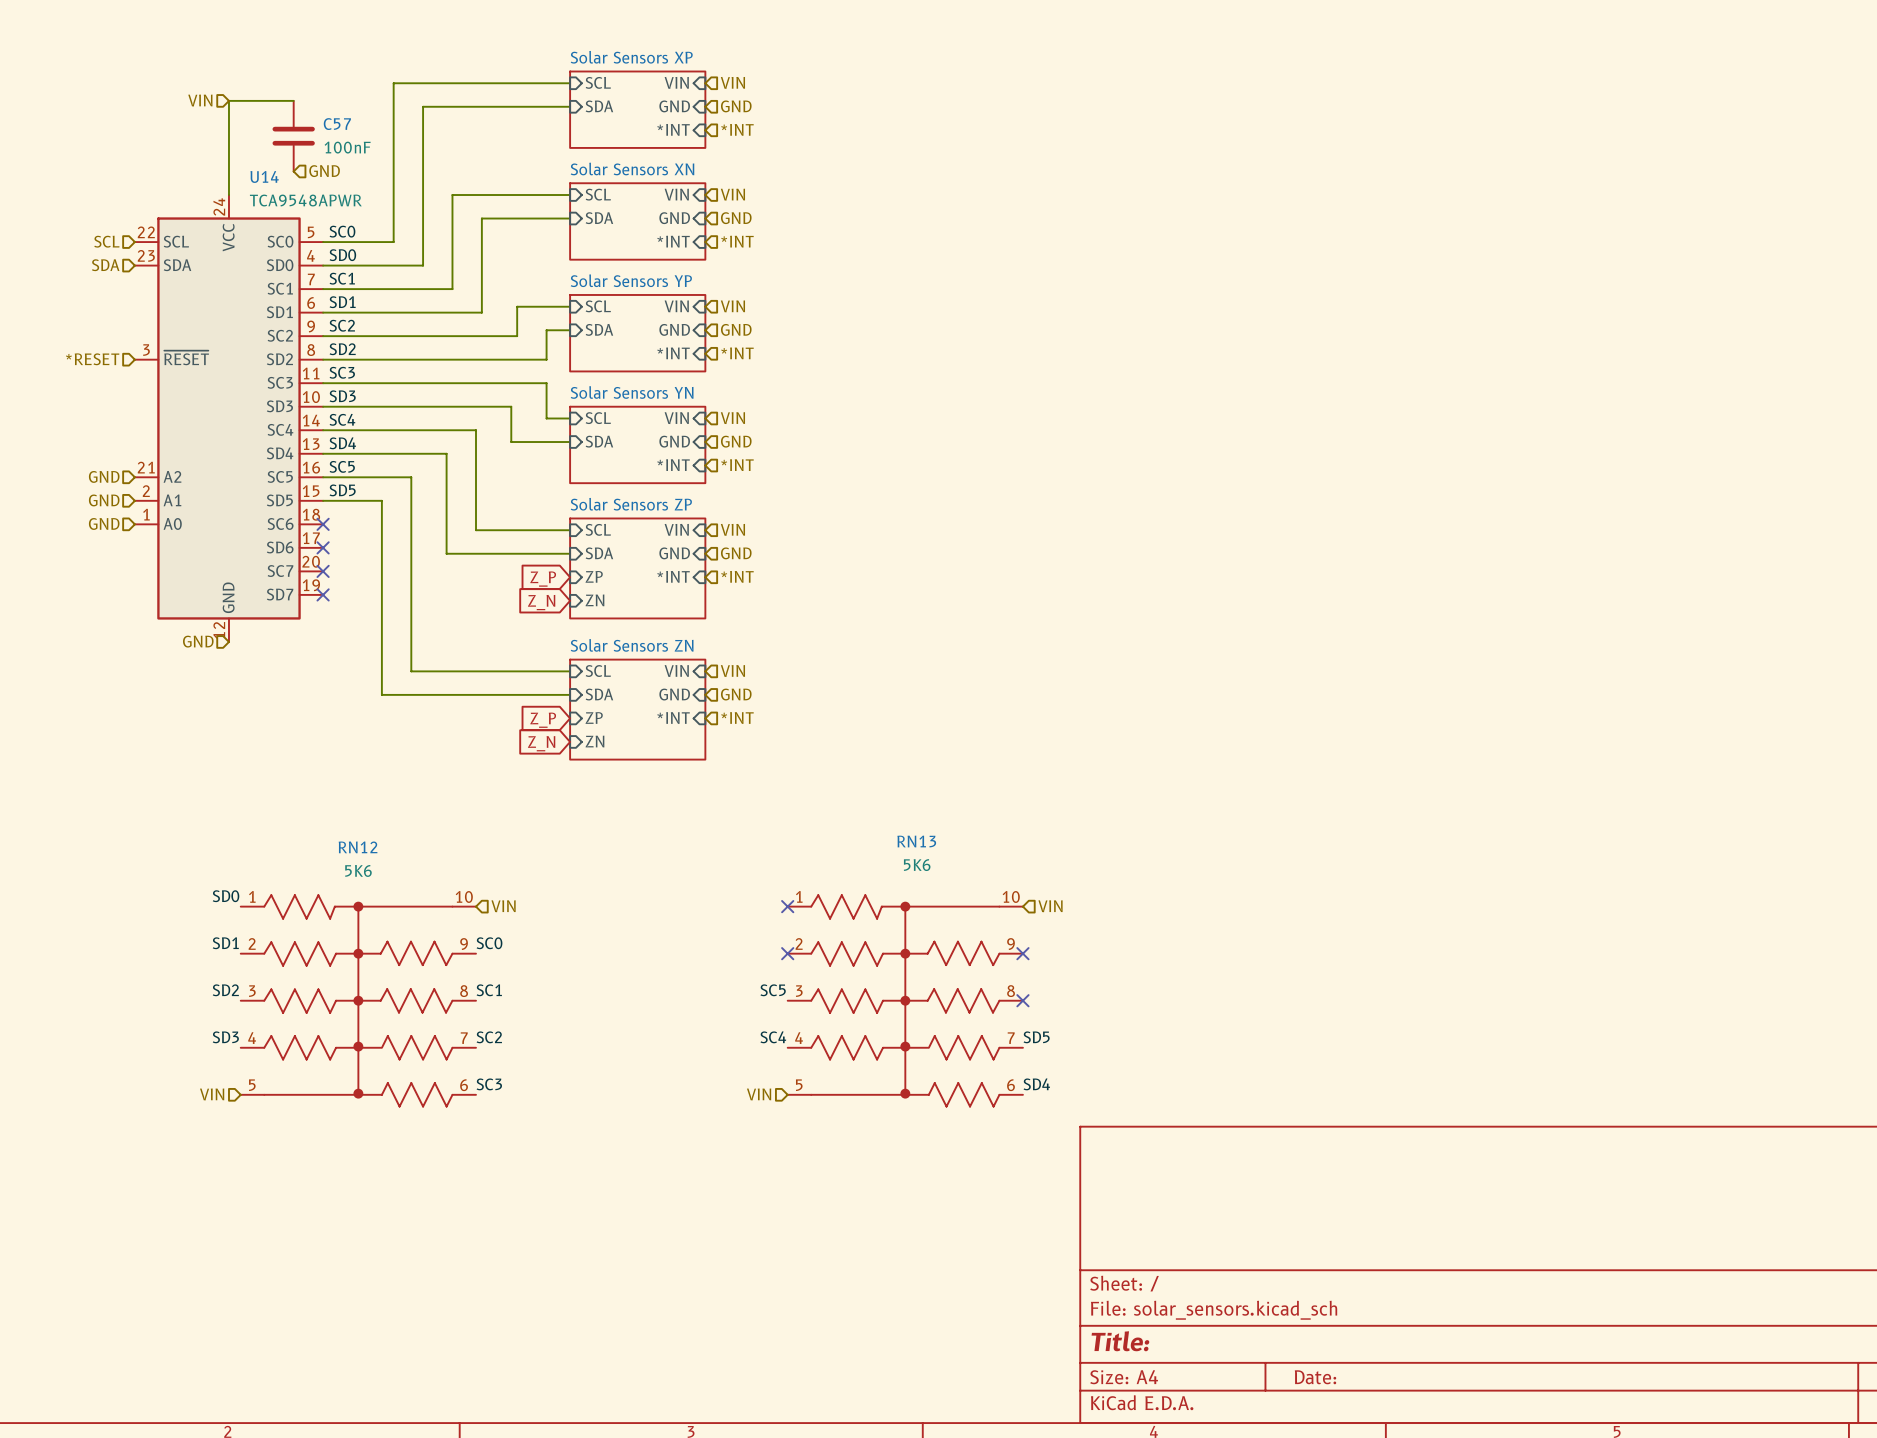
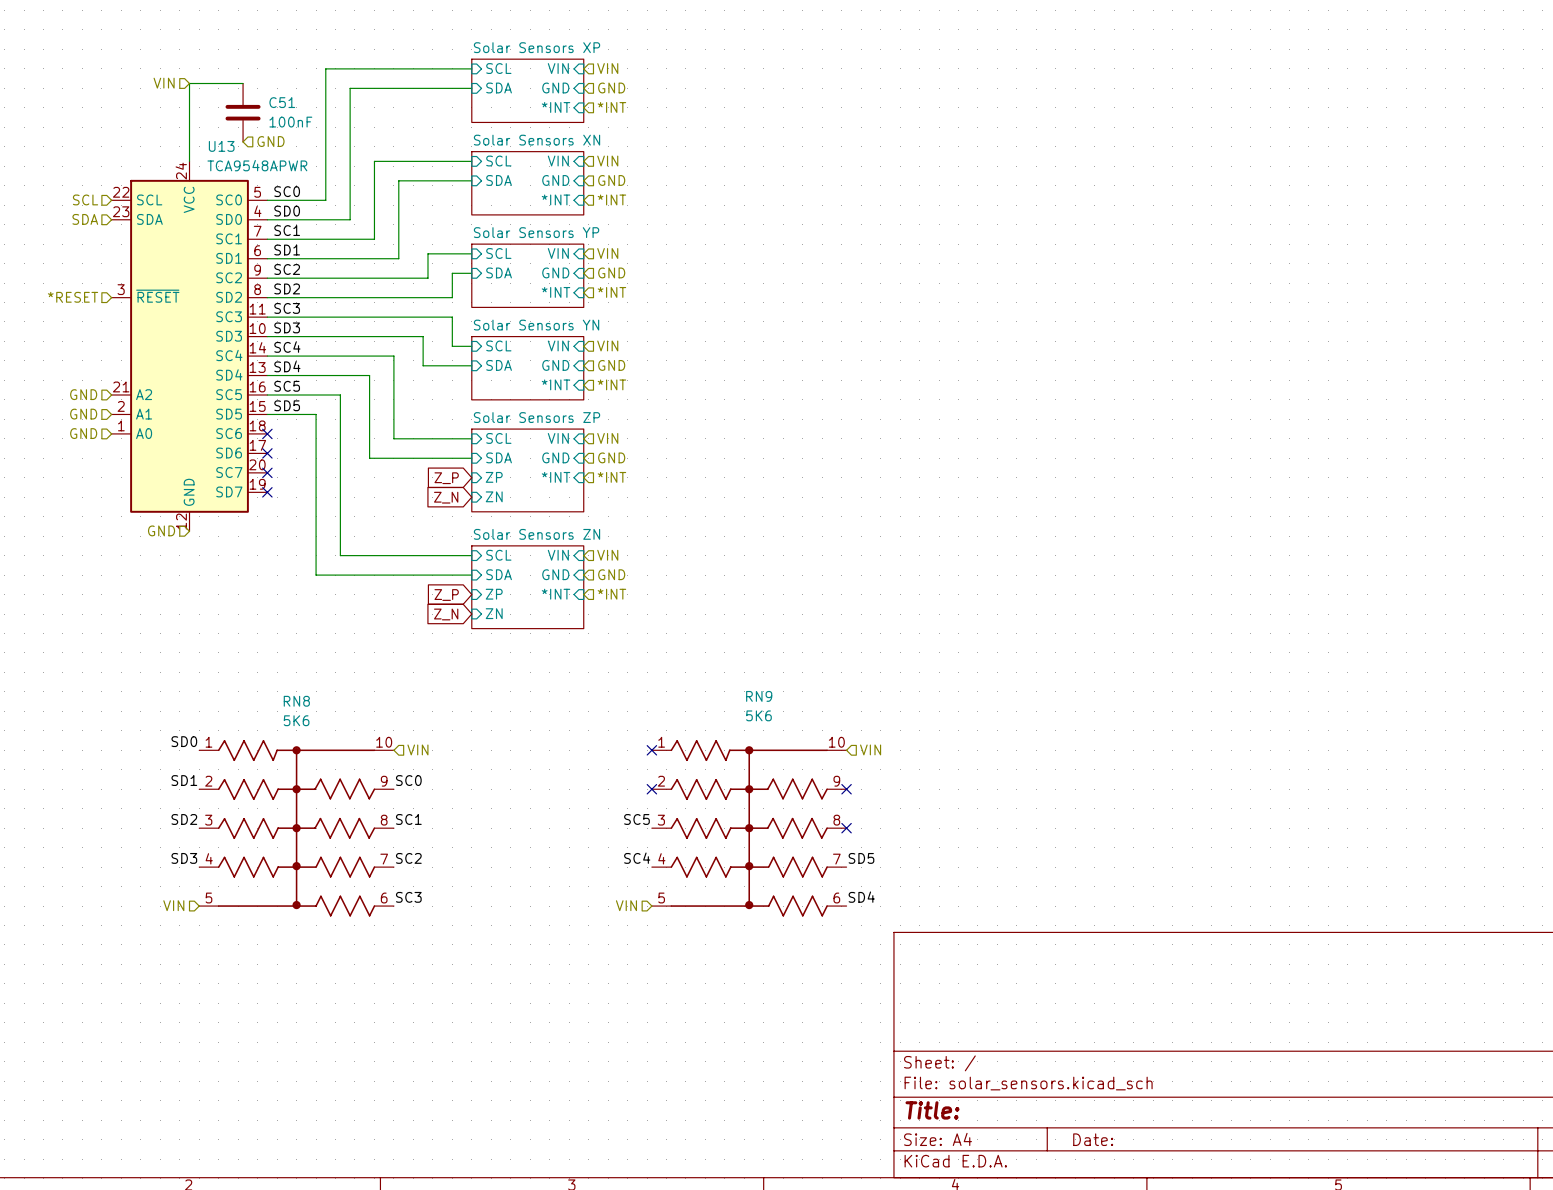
C57 name: C57 (337, 124) -> C51 (282, 102)
U14 name: U14 (264, 176) -> U13 (221, 146)
RN13 name: RN13 (916, 841) -> RN9 (759, 696)
RN12 name: RN12 (358, 847) -> RN8 (296, 701)

